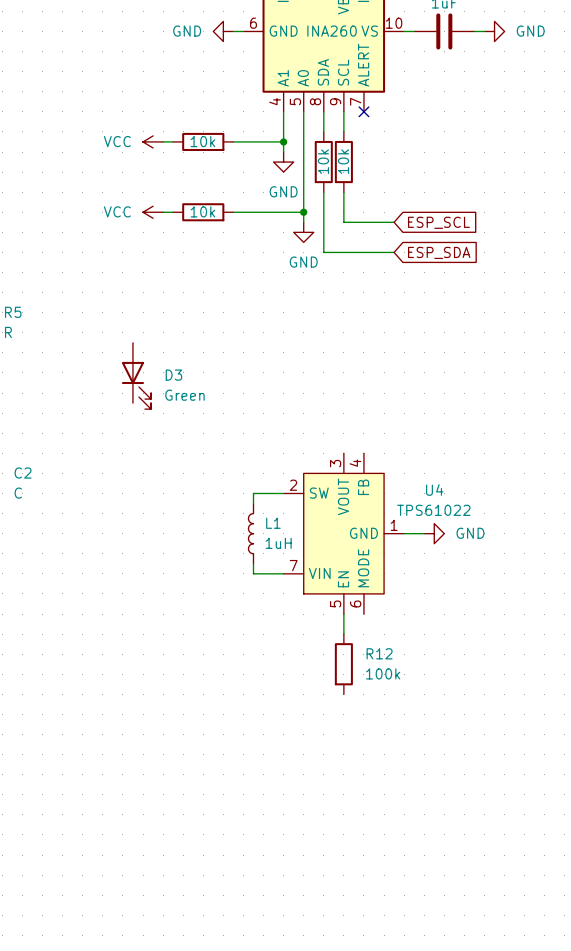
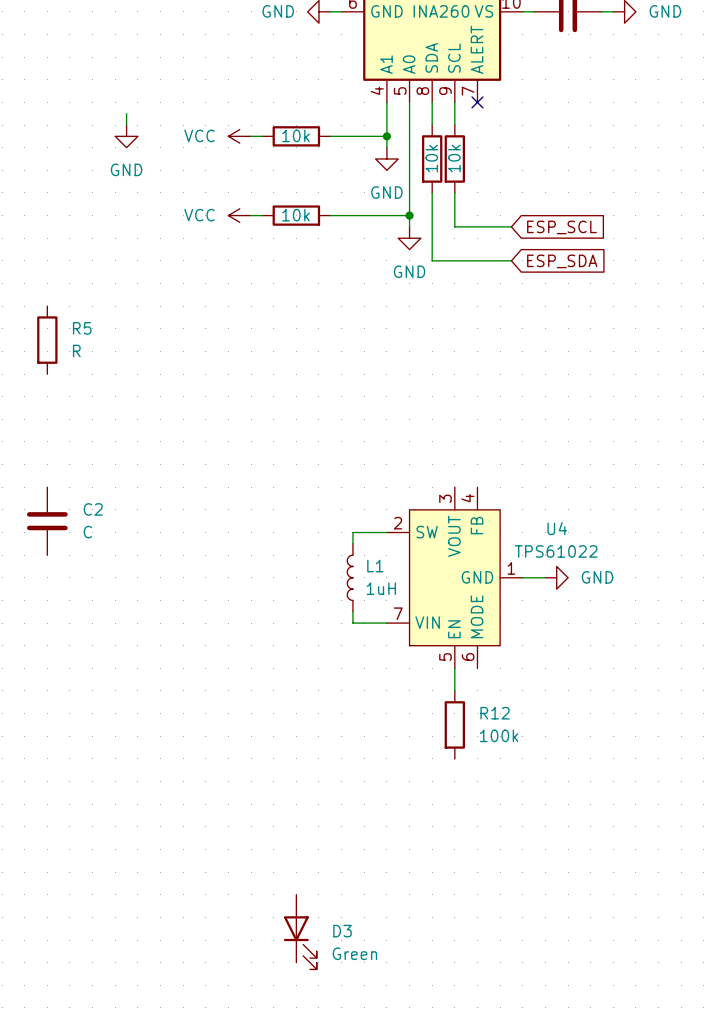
wire: none -> (126, 113) (126, 125)
power symbol: none -> GND (126, 136)
D3 position: (136, 375) -> (300, 932)

